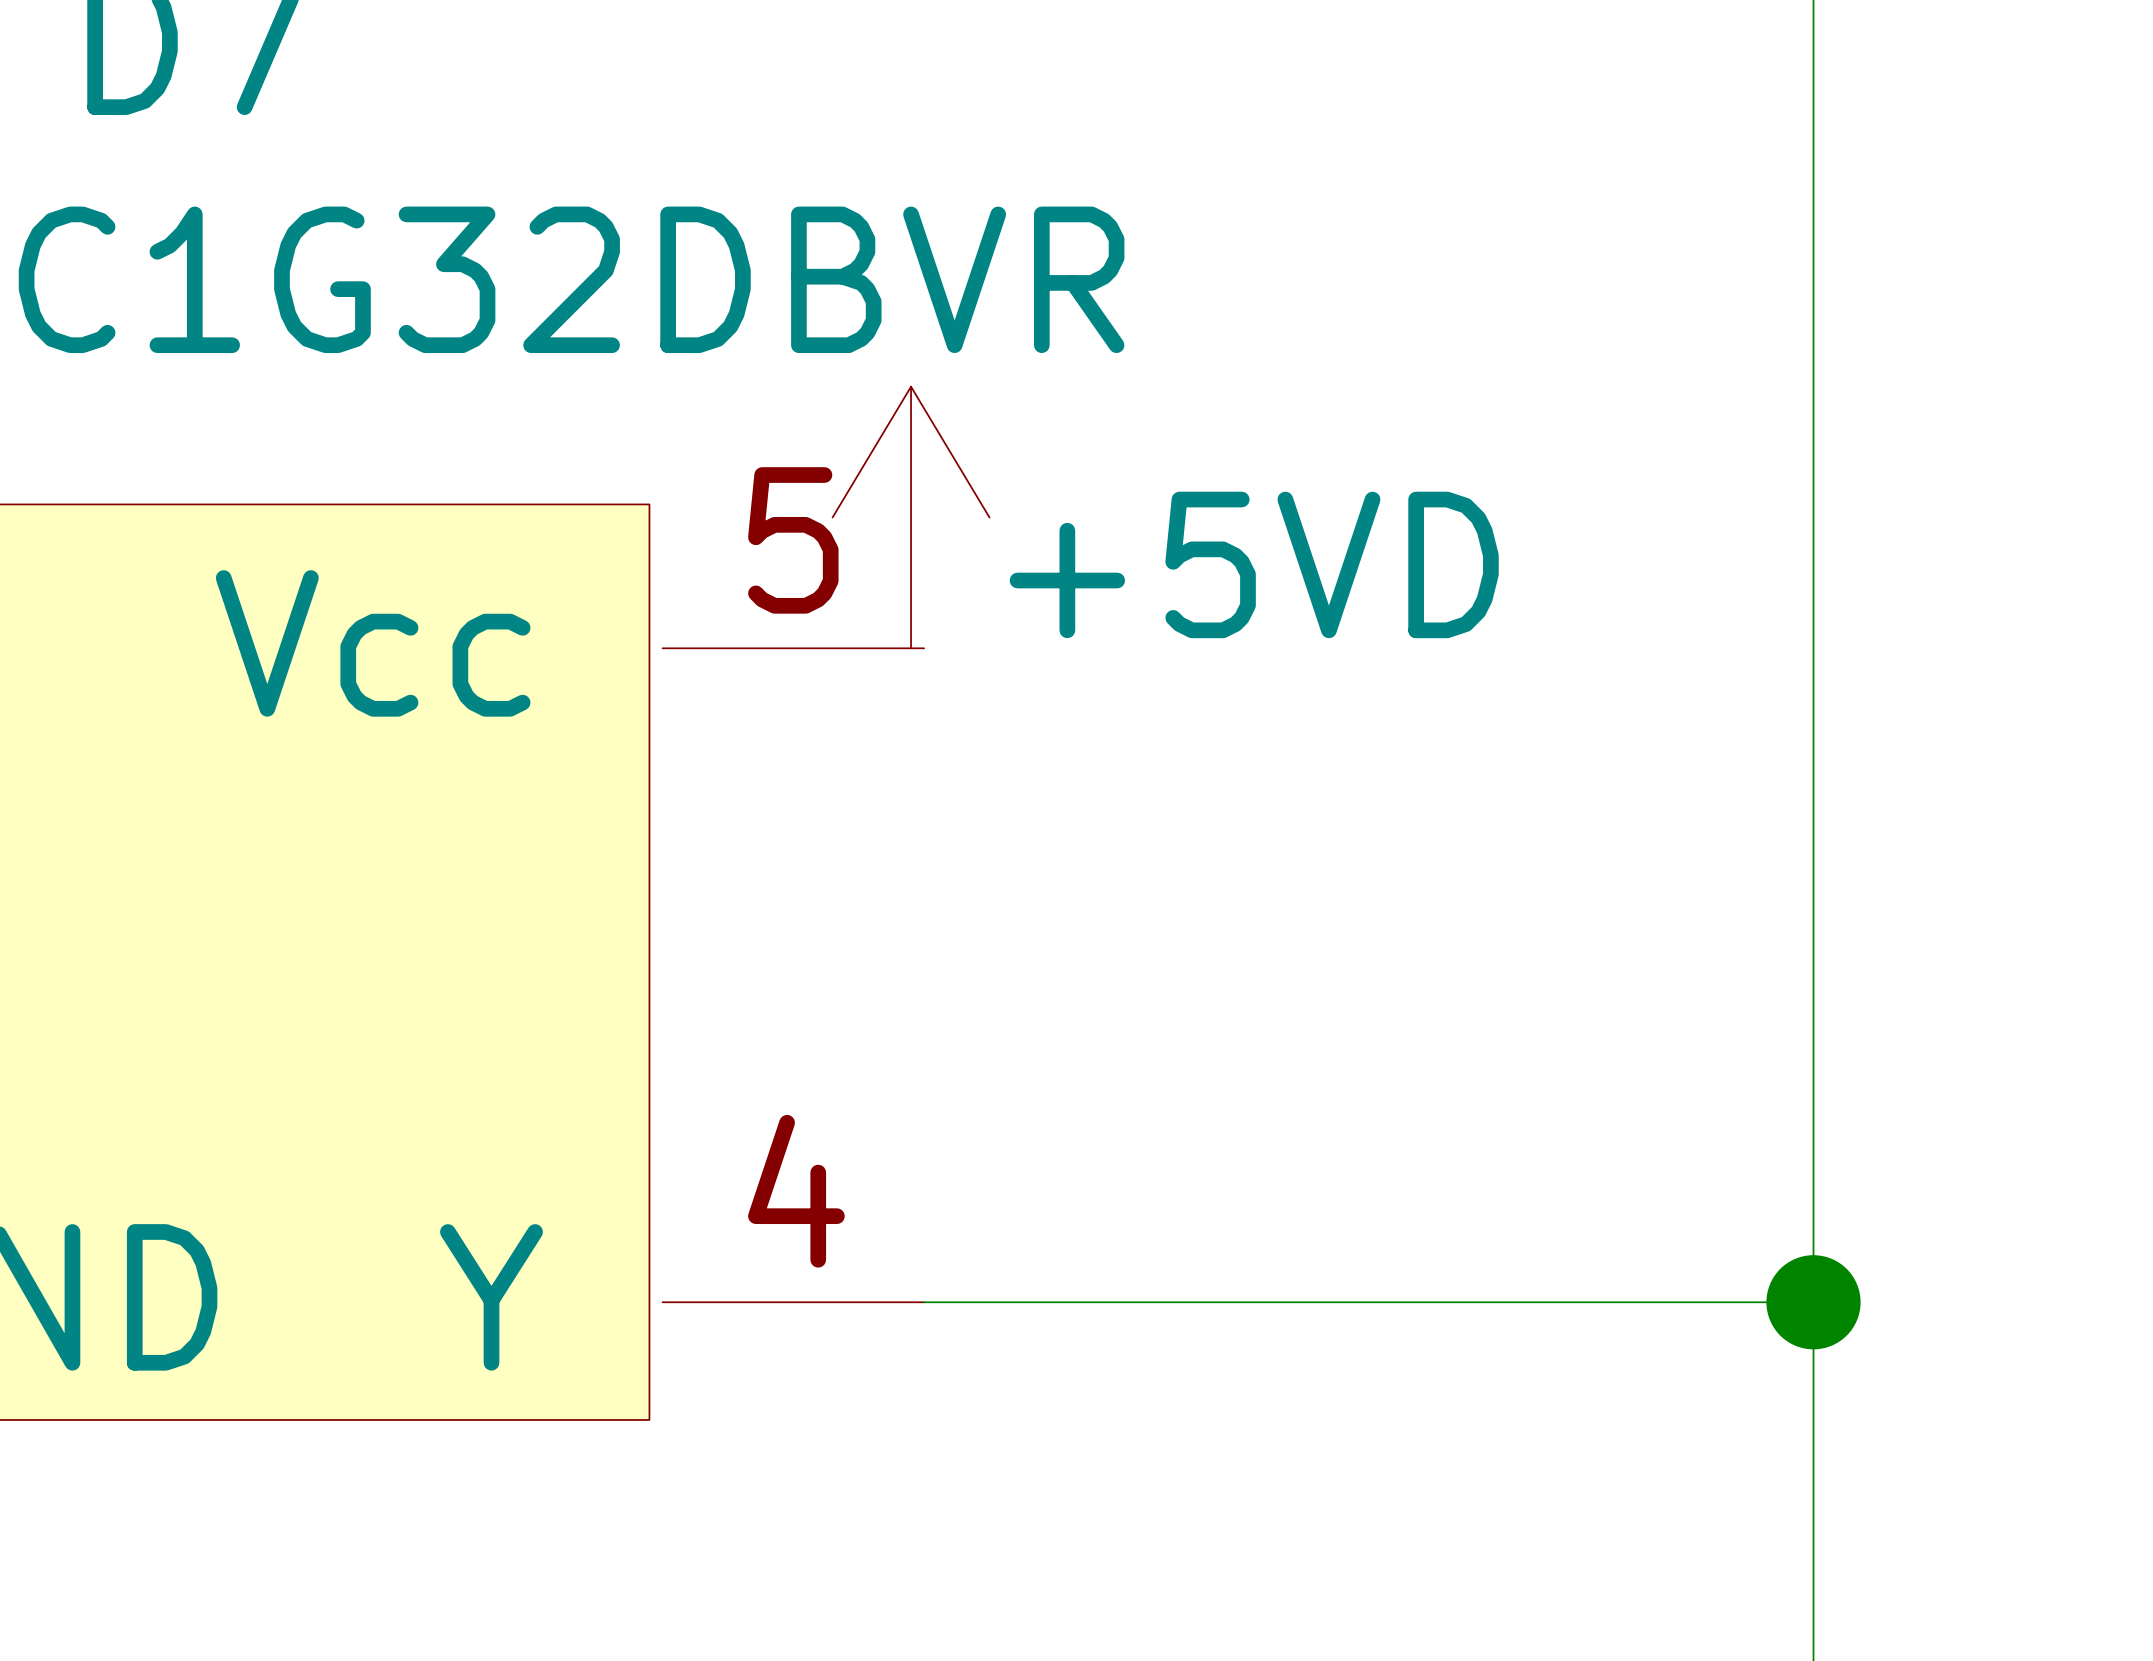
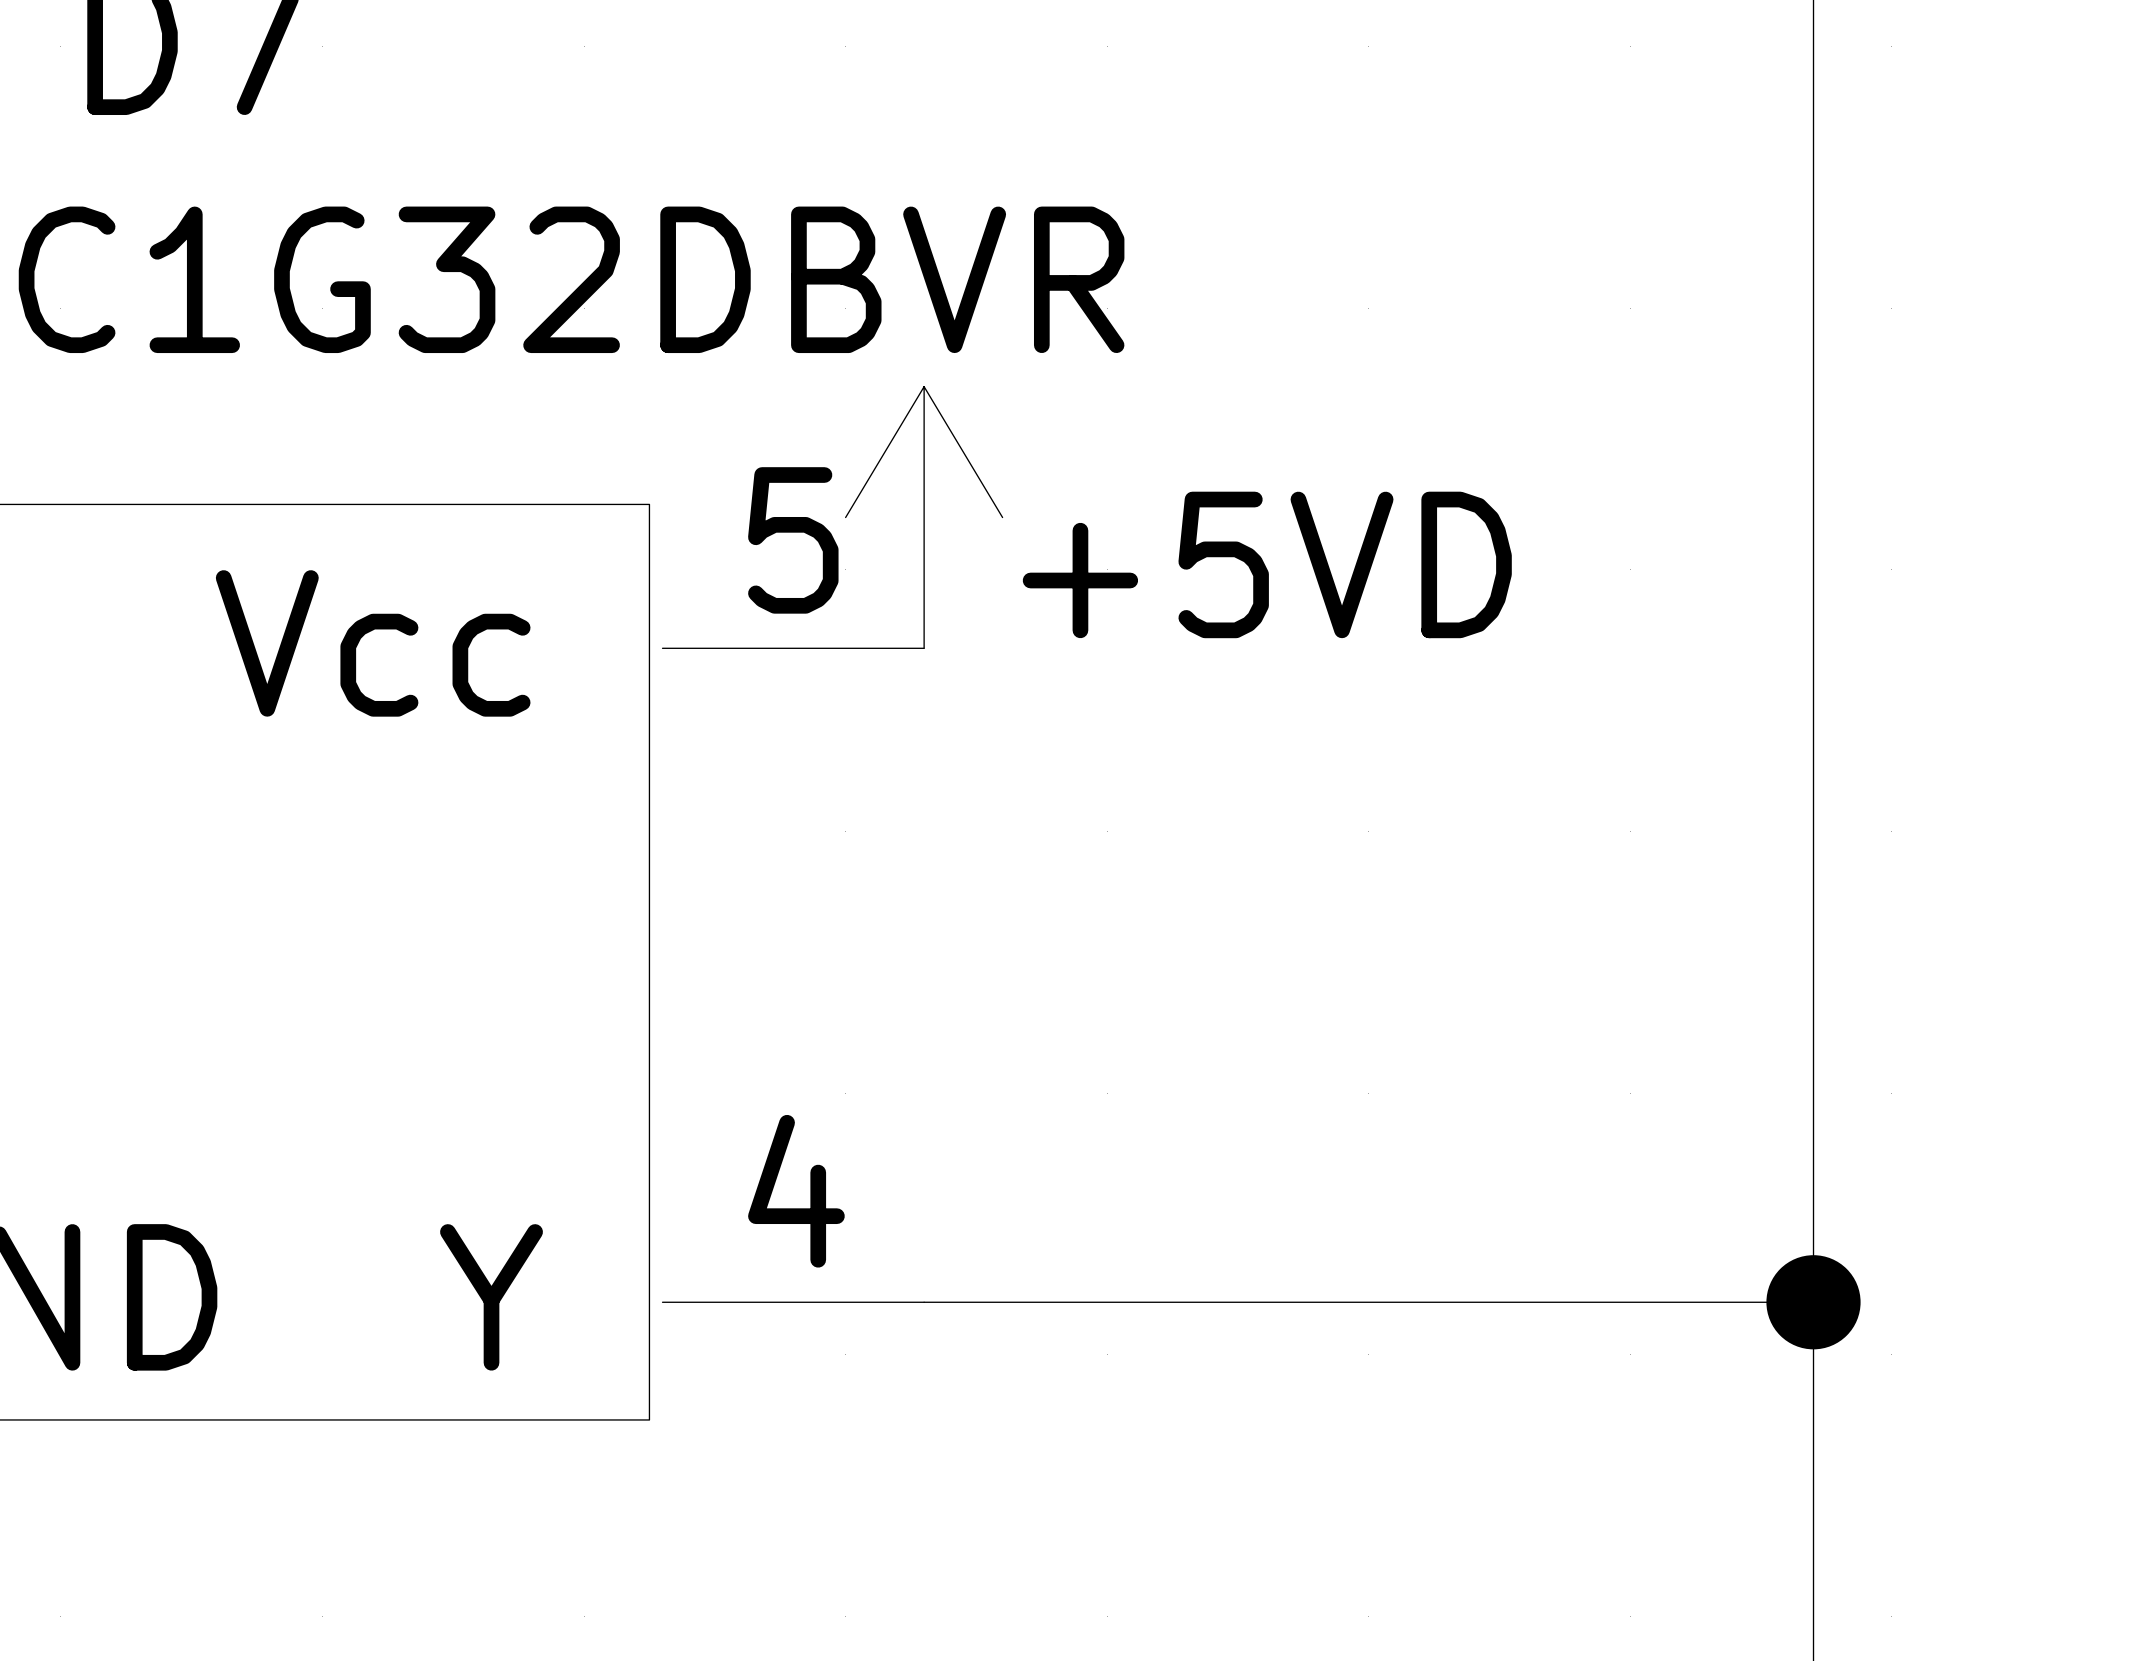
power symbol position: +5VD (911, 517) -> +5VD (924, 517)

